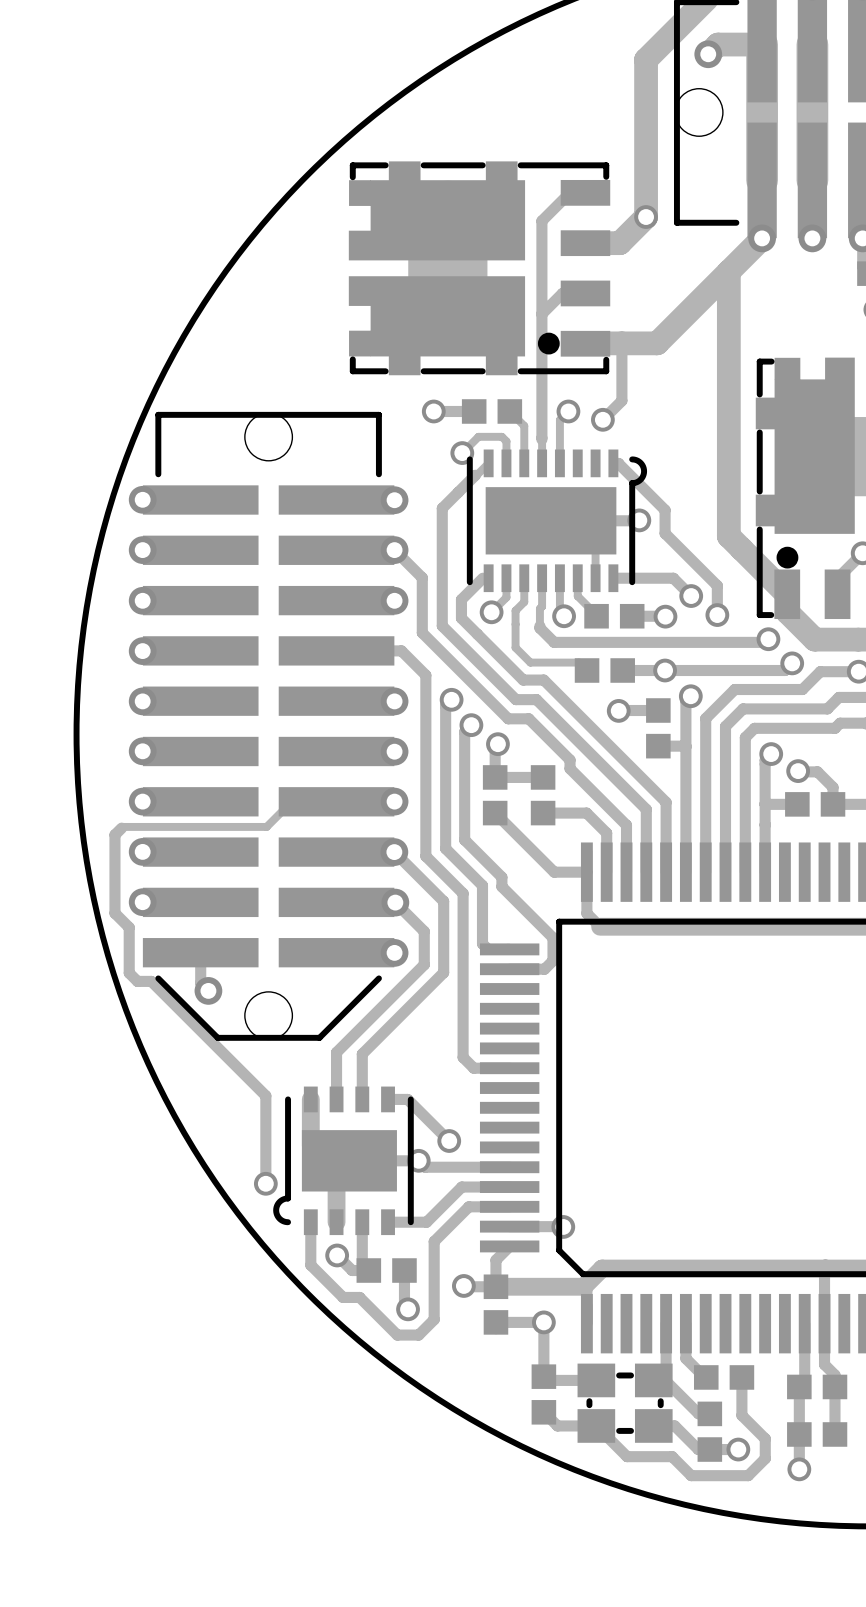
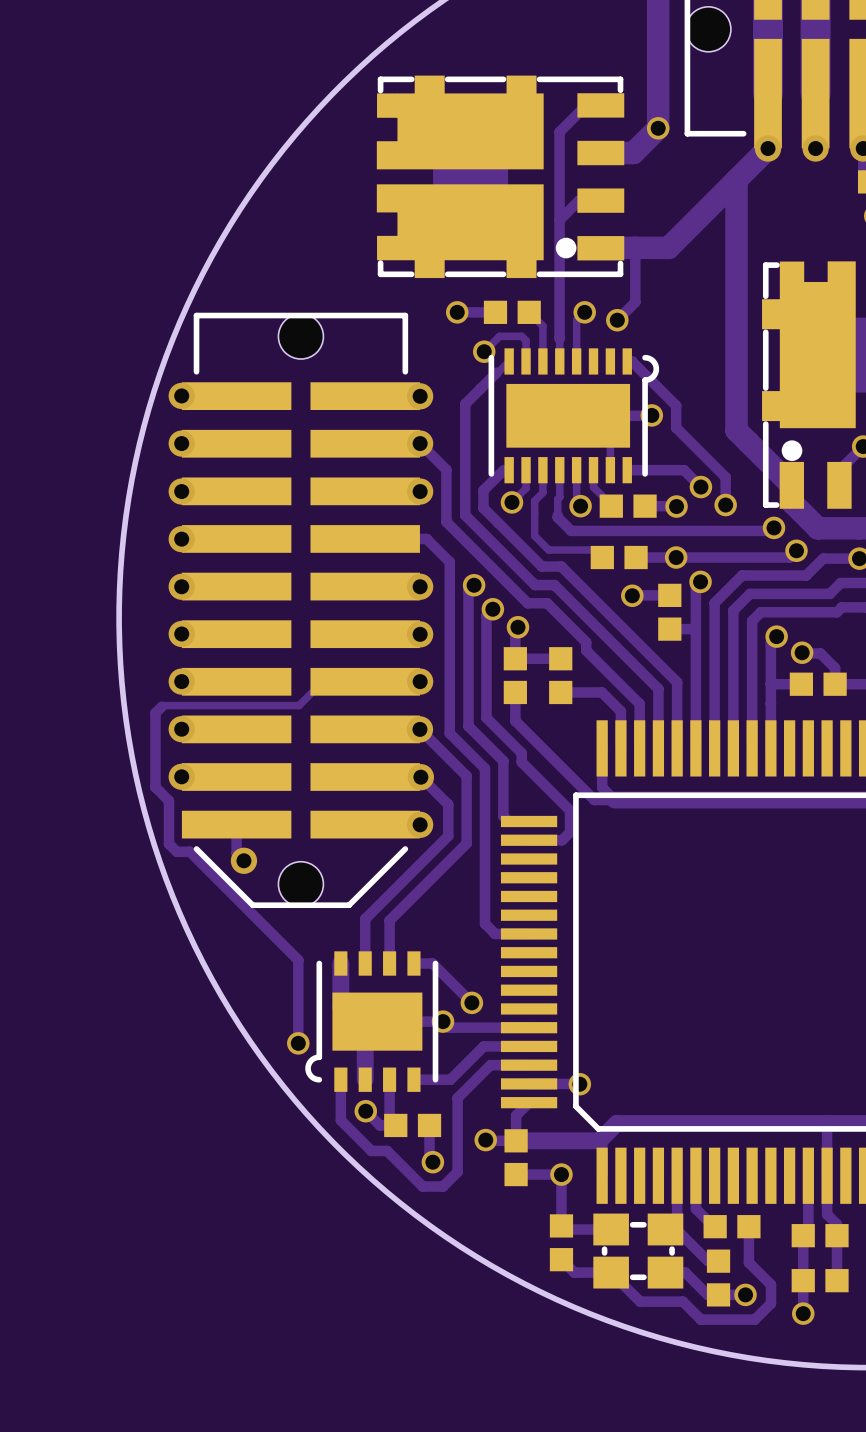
track: (495, 813) (554, 872) (586, 872) -> (515, 692) (515, 720) (594, 800) (614, 800)

